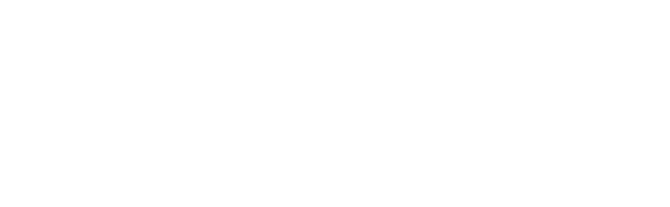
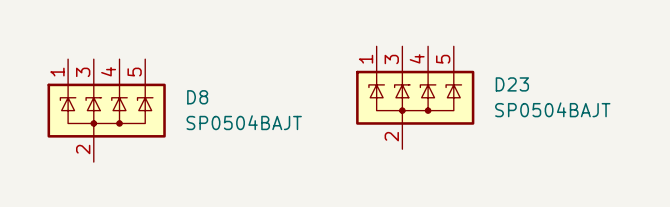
D23: none -> SP0504BAJT (415, 97)
D8: none -> SP0504BAJT (106, 110)

